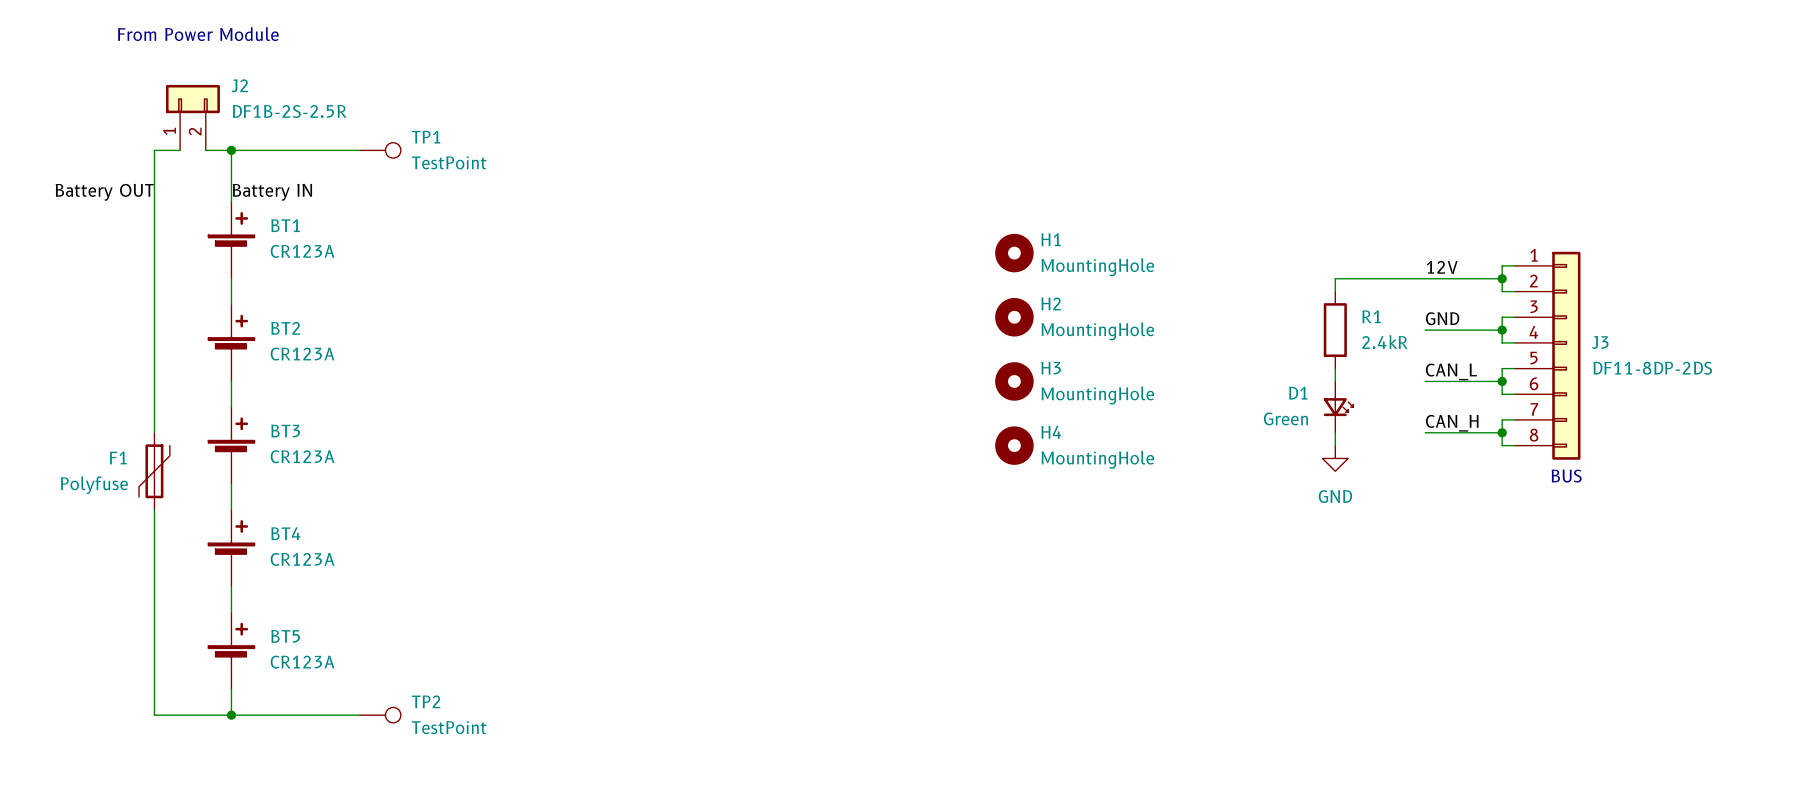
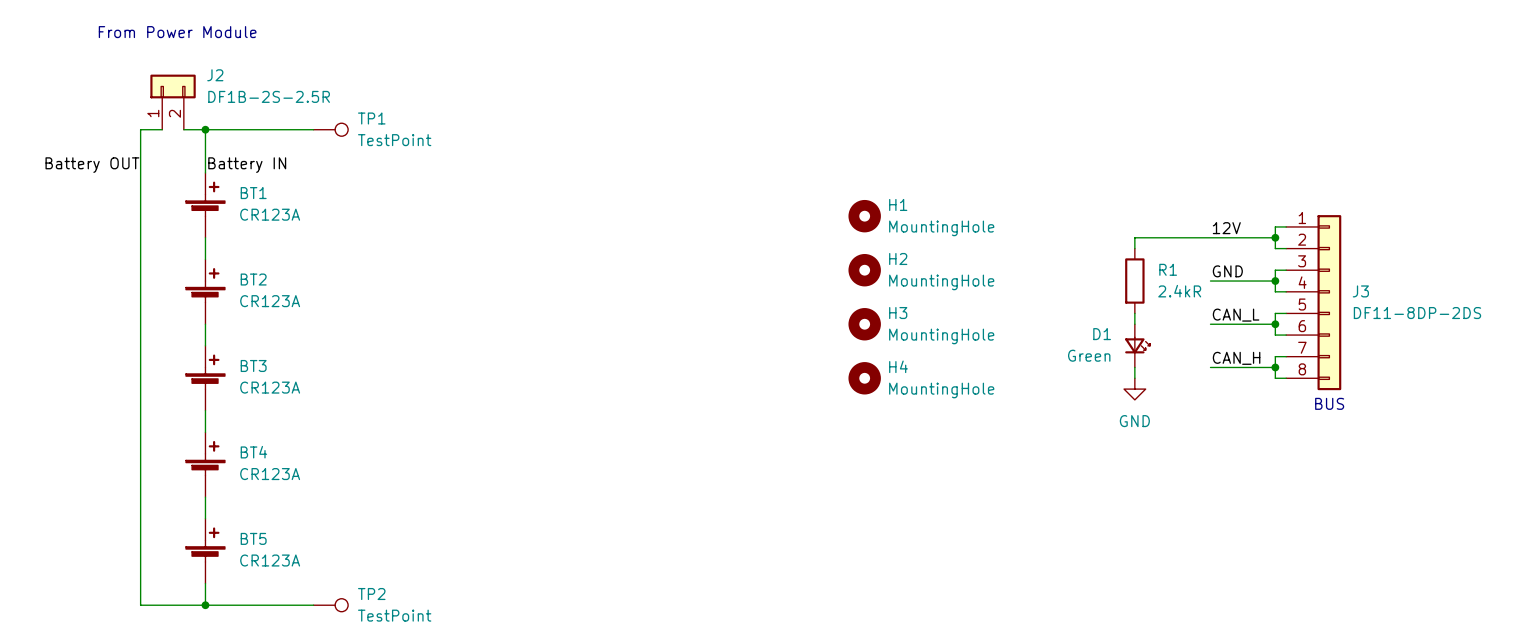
F1: Polyfuse (154, 471) -> none

